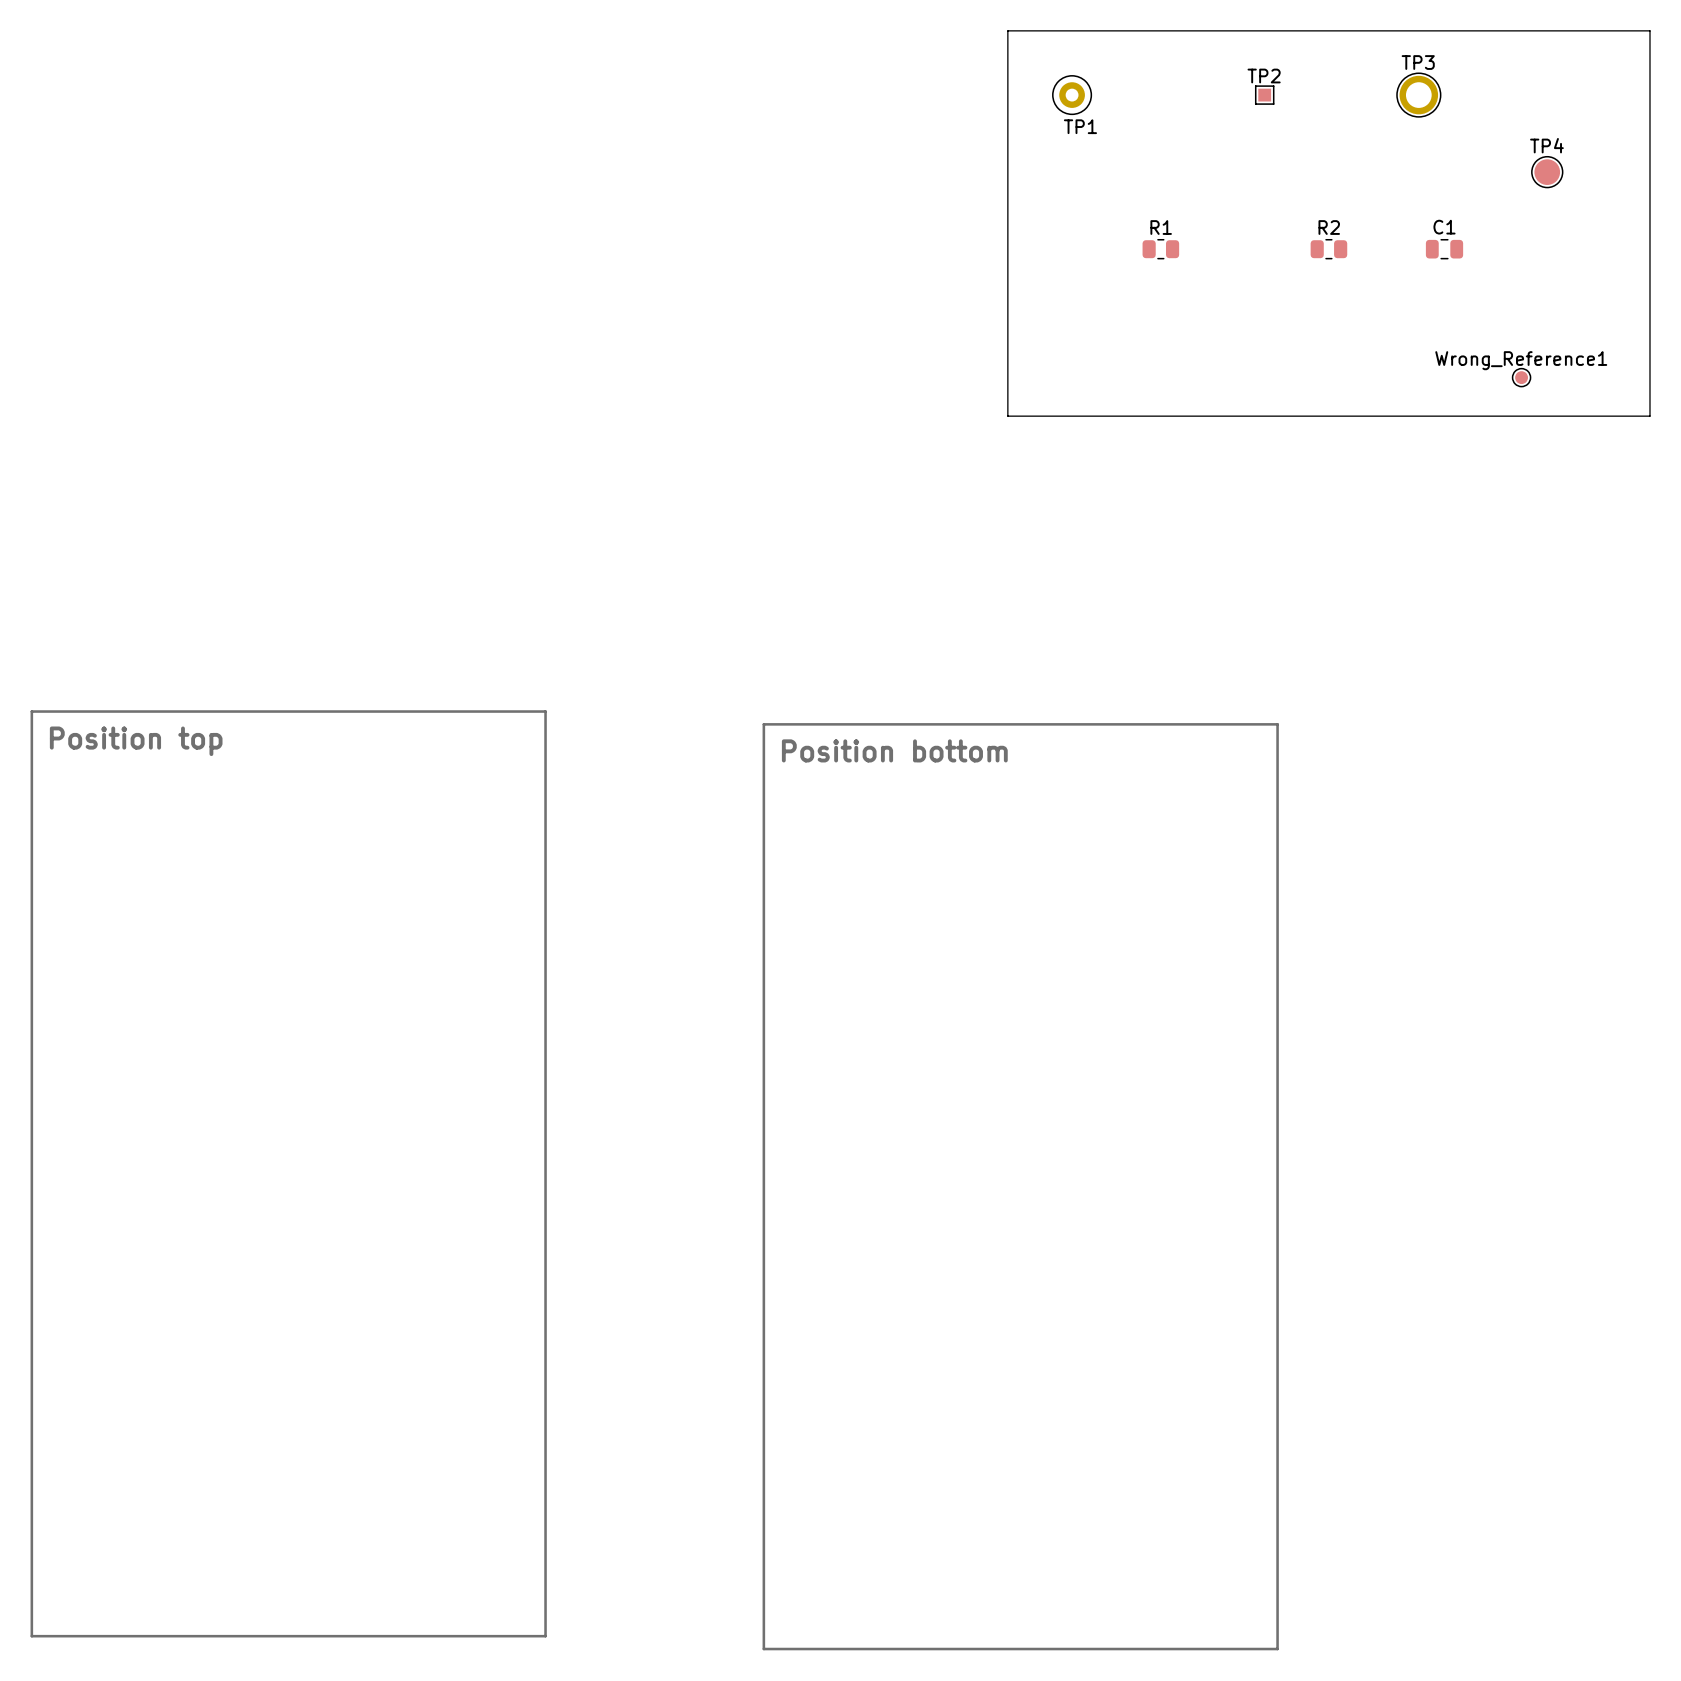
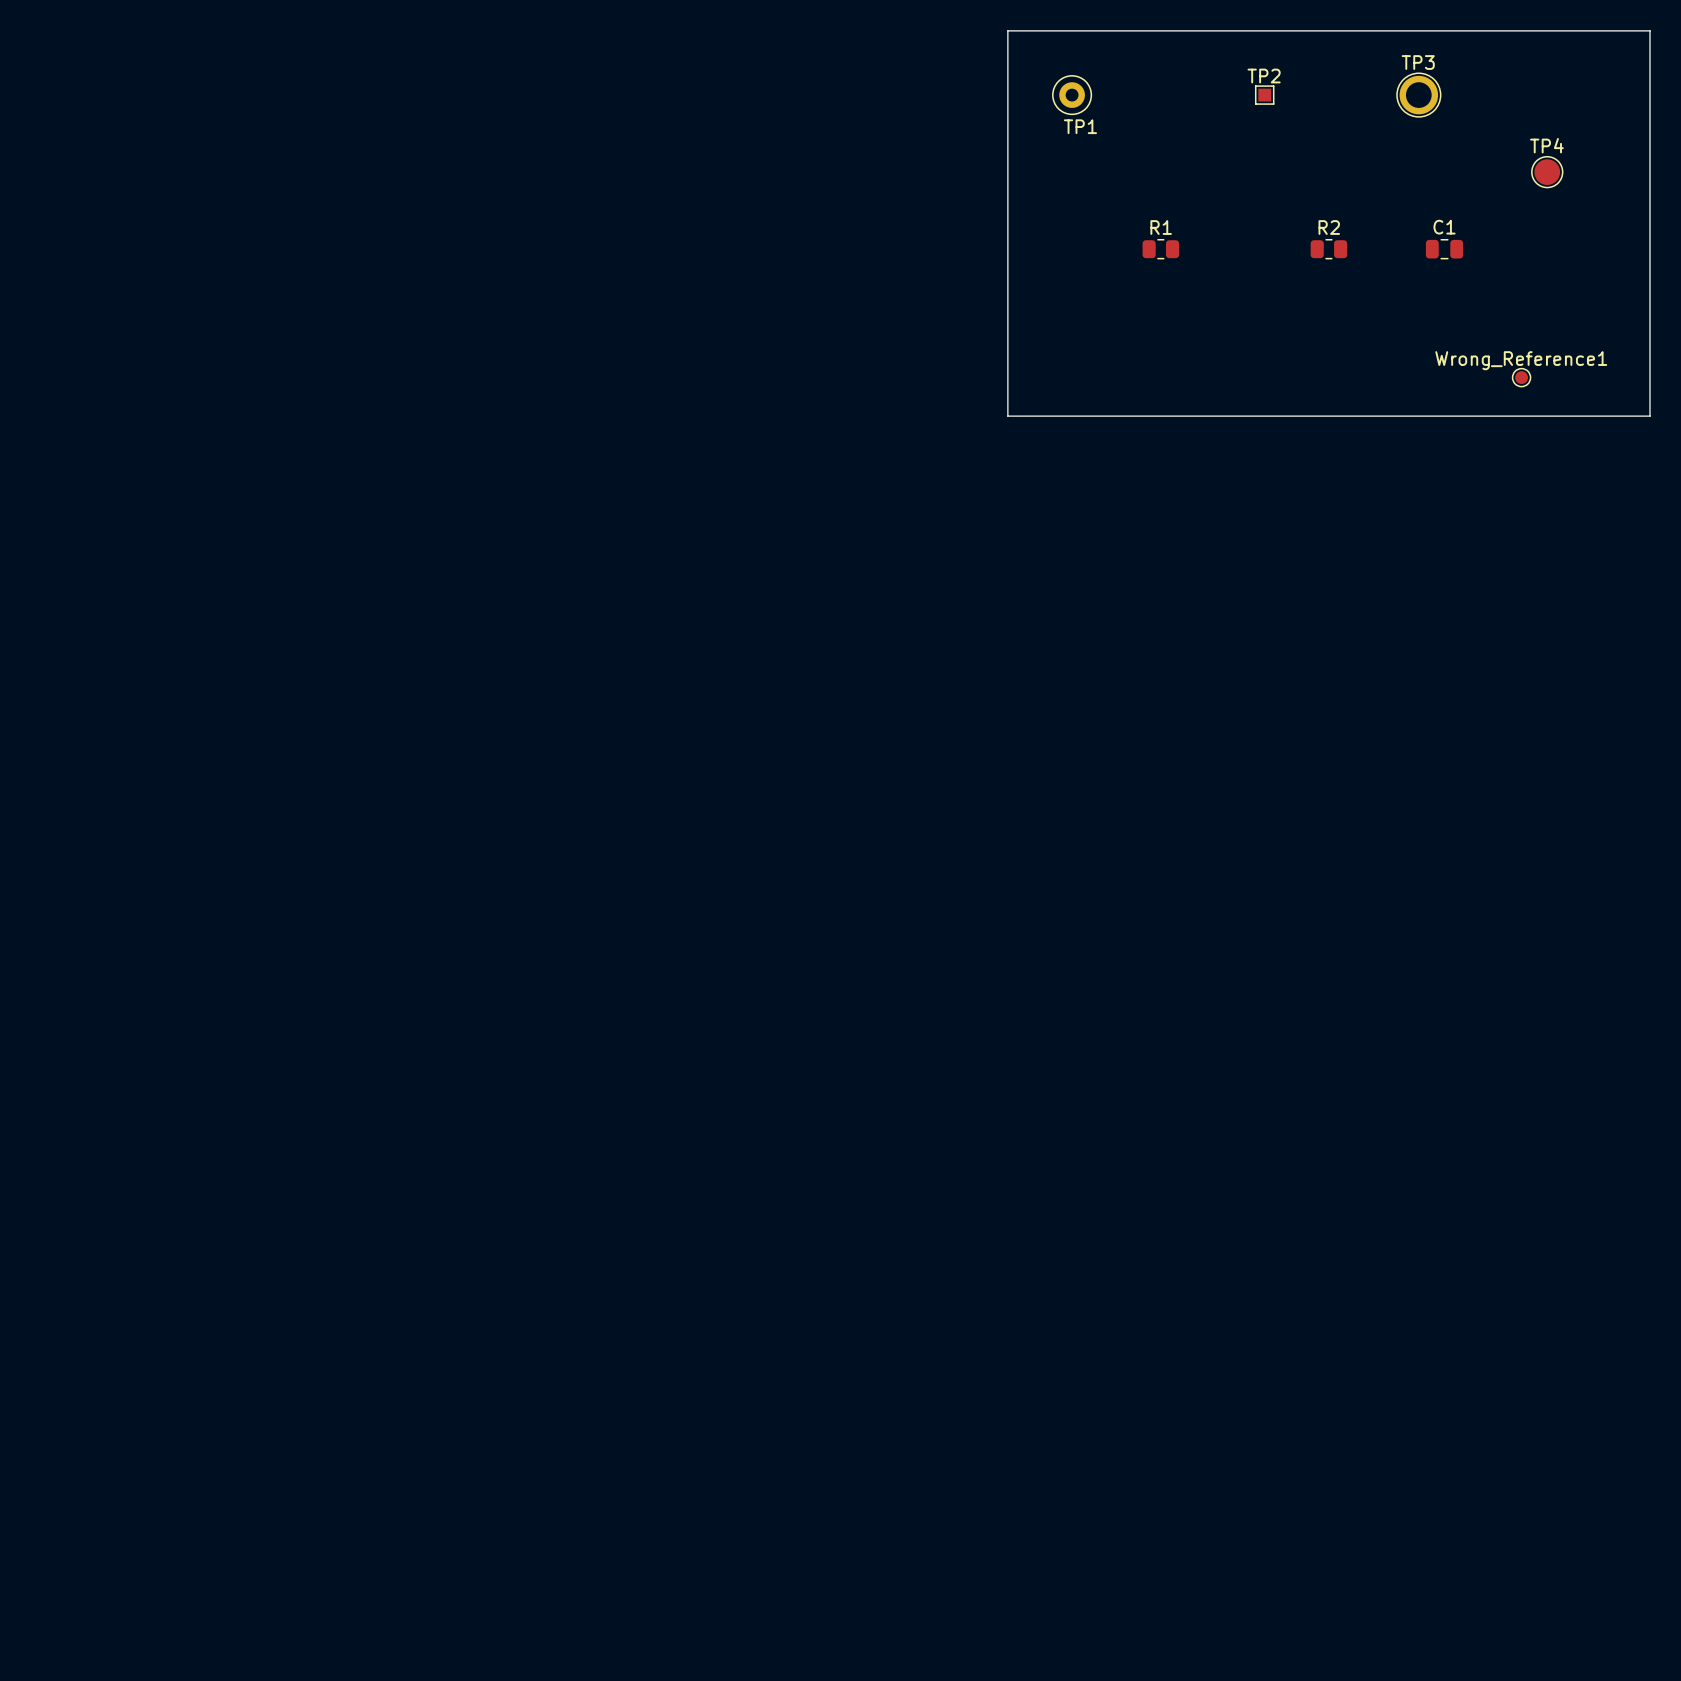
line: (31, 711) (545, 711) (545, 1636) (31, 1636) (31, 711) -> none
line: (763, 724) (1277, 724) (1277, 1649) (763, 1649) (763, 724) -> none
text: Position top (136, 741) -> none
text: Position bottom (894, 750) -> none

